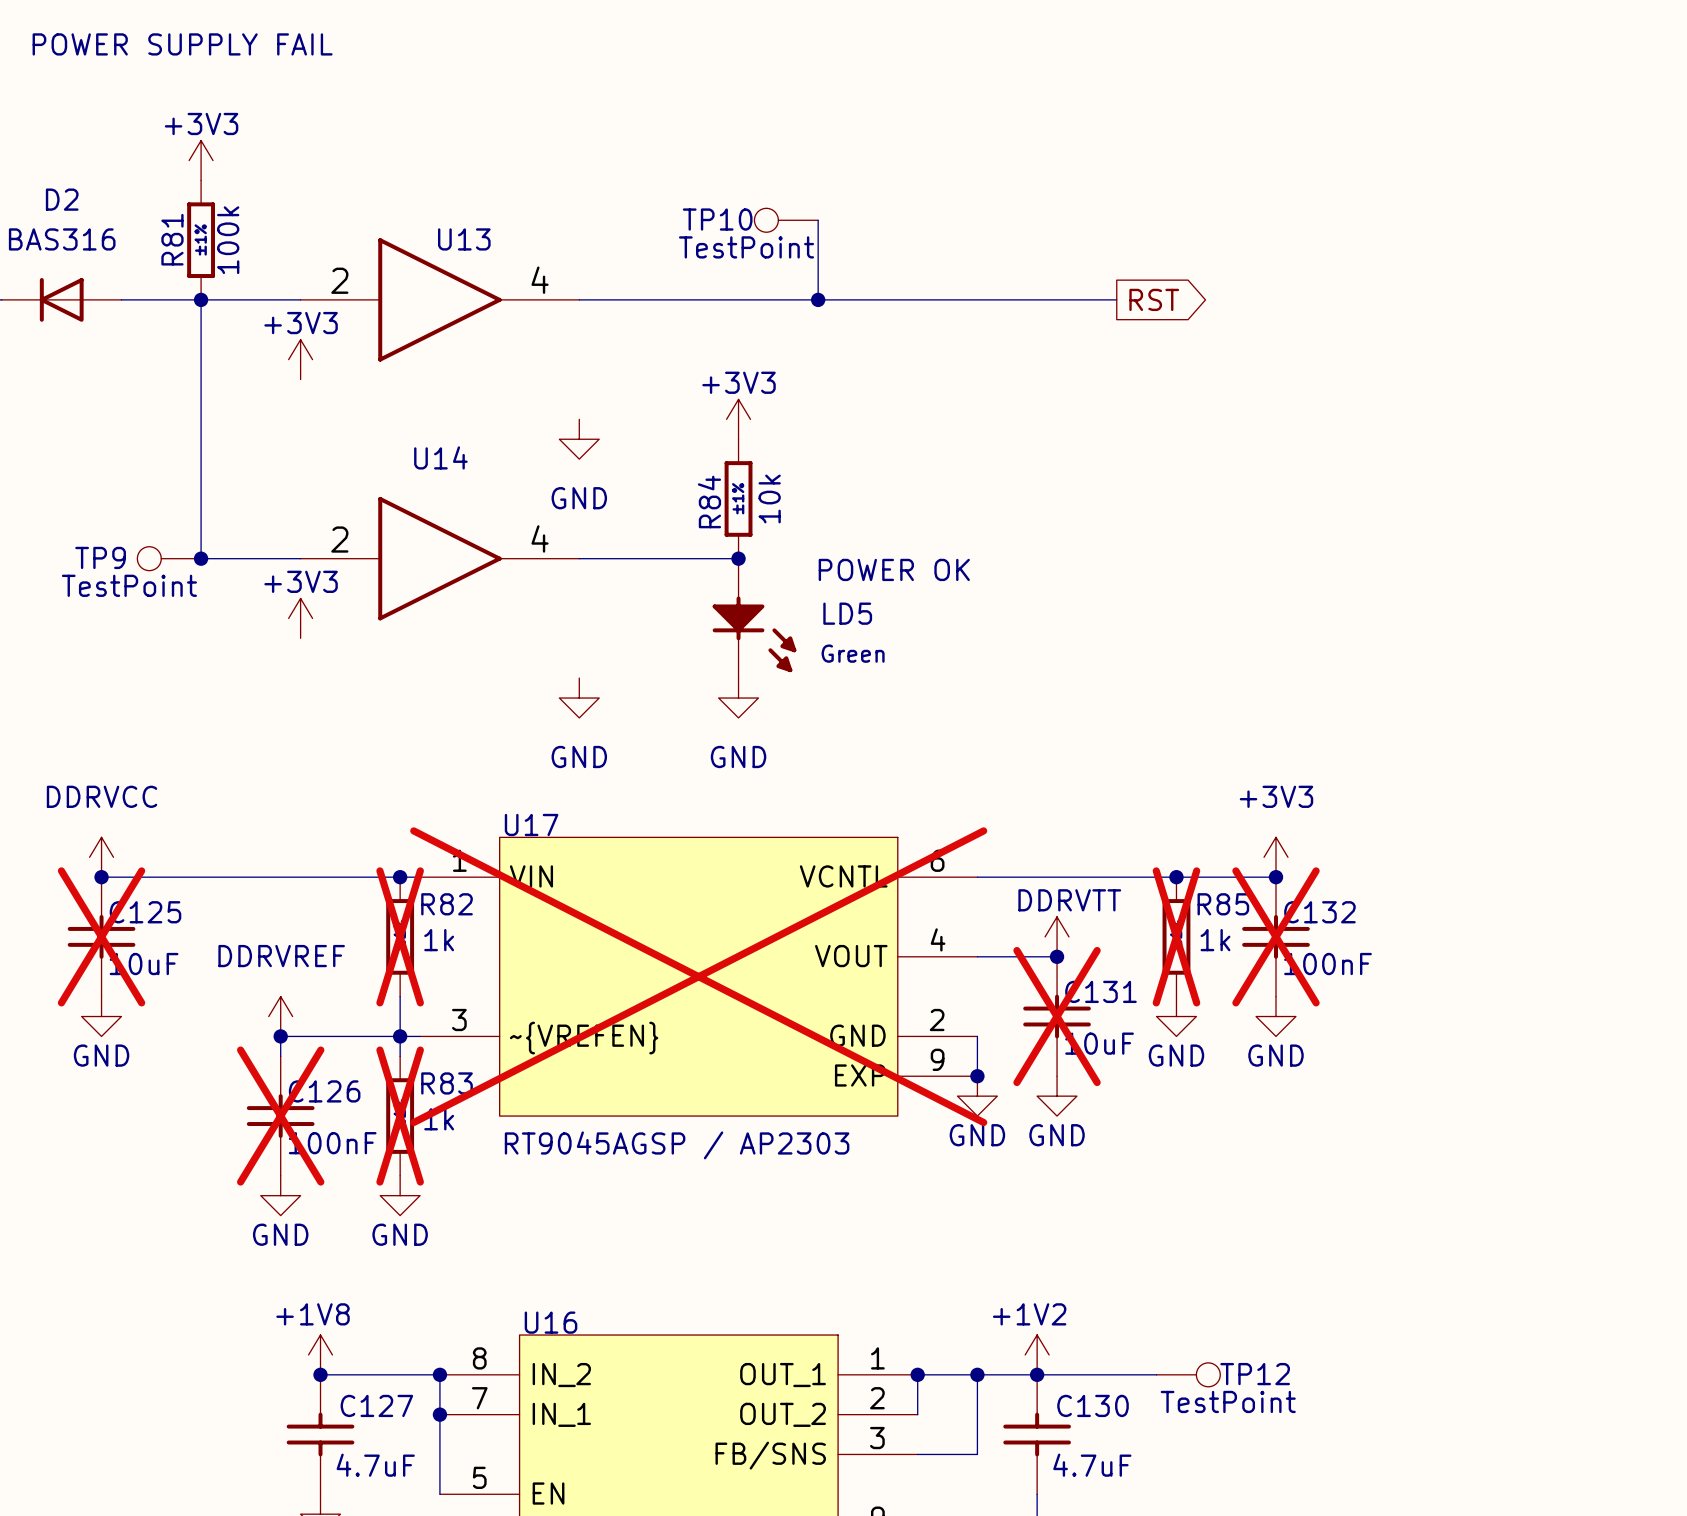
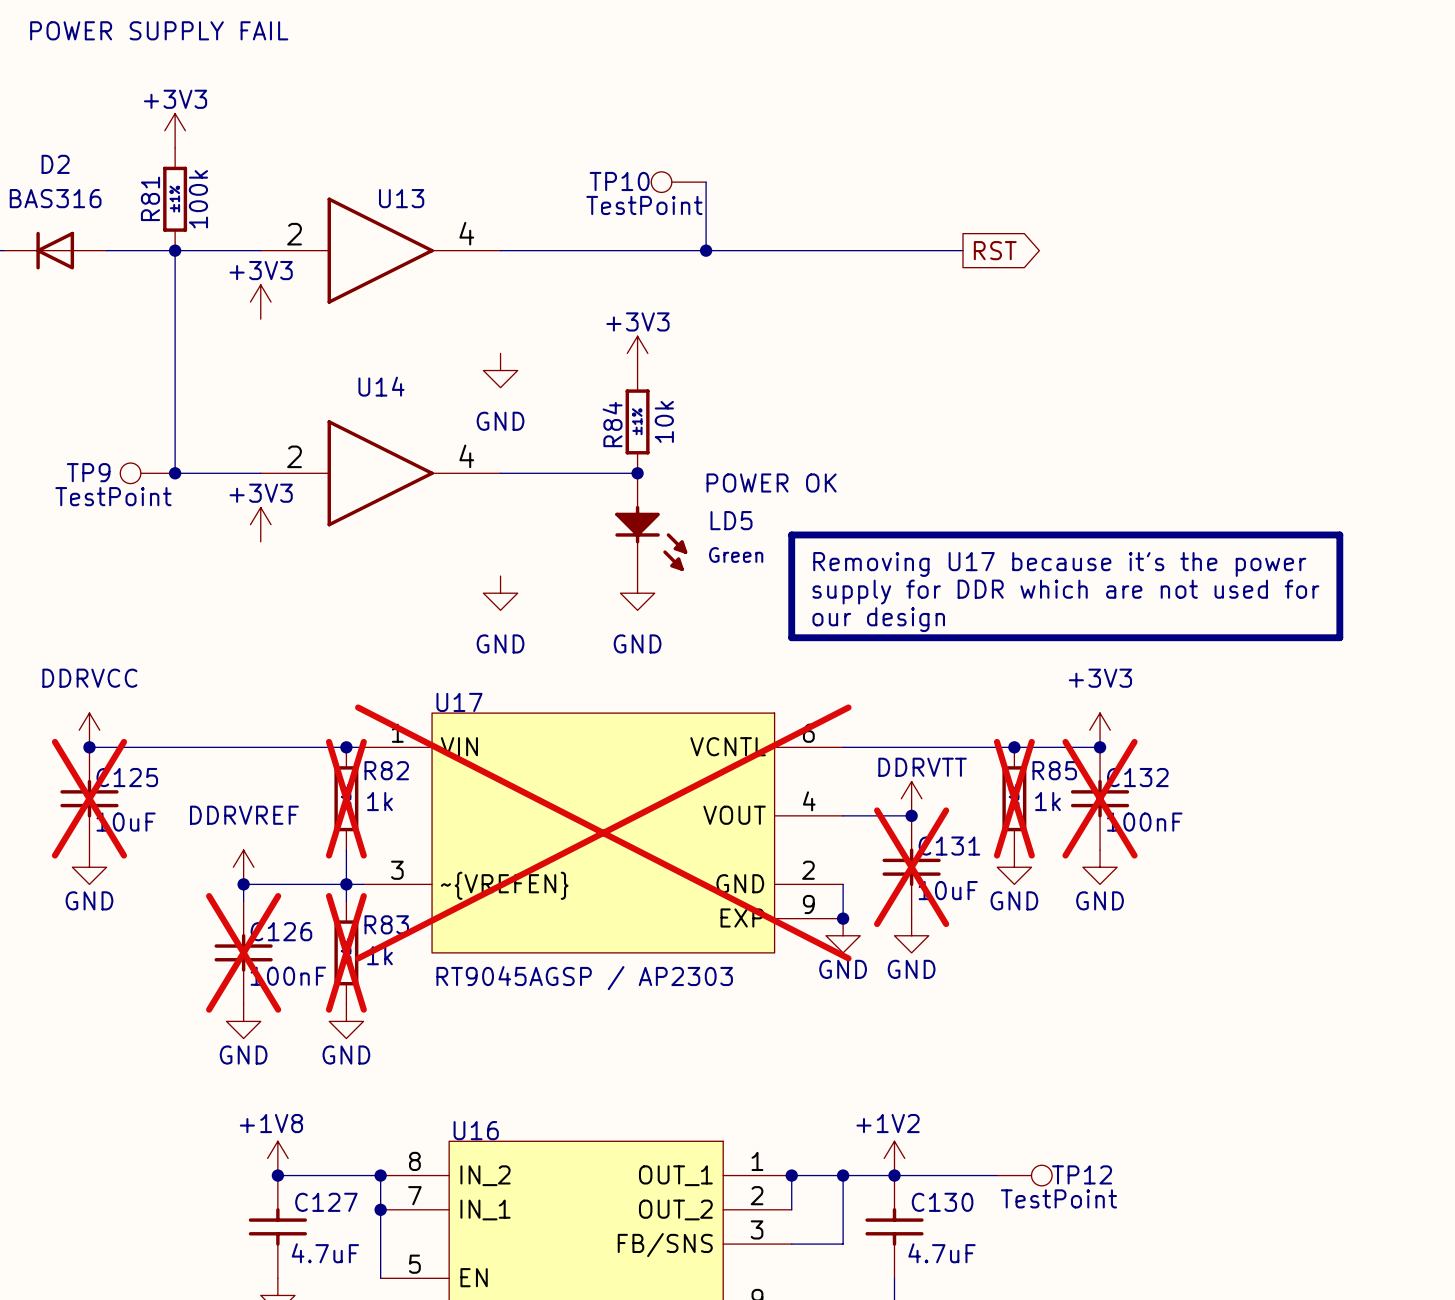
line: none -> (791, 534) (1339, 534) (1339, 637) (791, 637) (791, 534)
text: none -> Removing U17 because it's the power (1059, 564)
text: none -> supply for DDR which are not used for (1065, 592)
text: none -> our design (878, 619)

